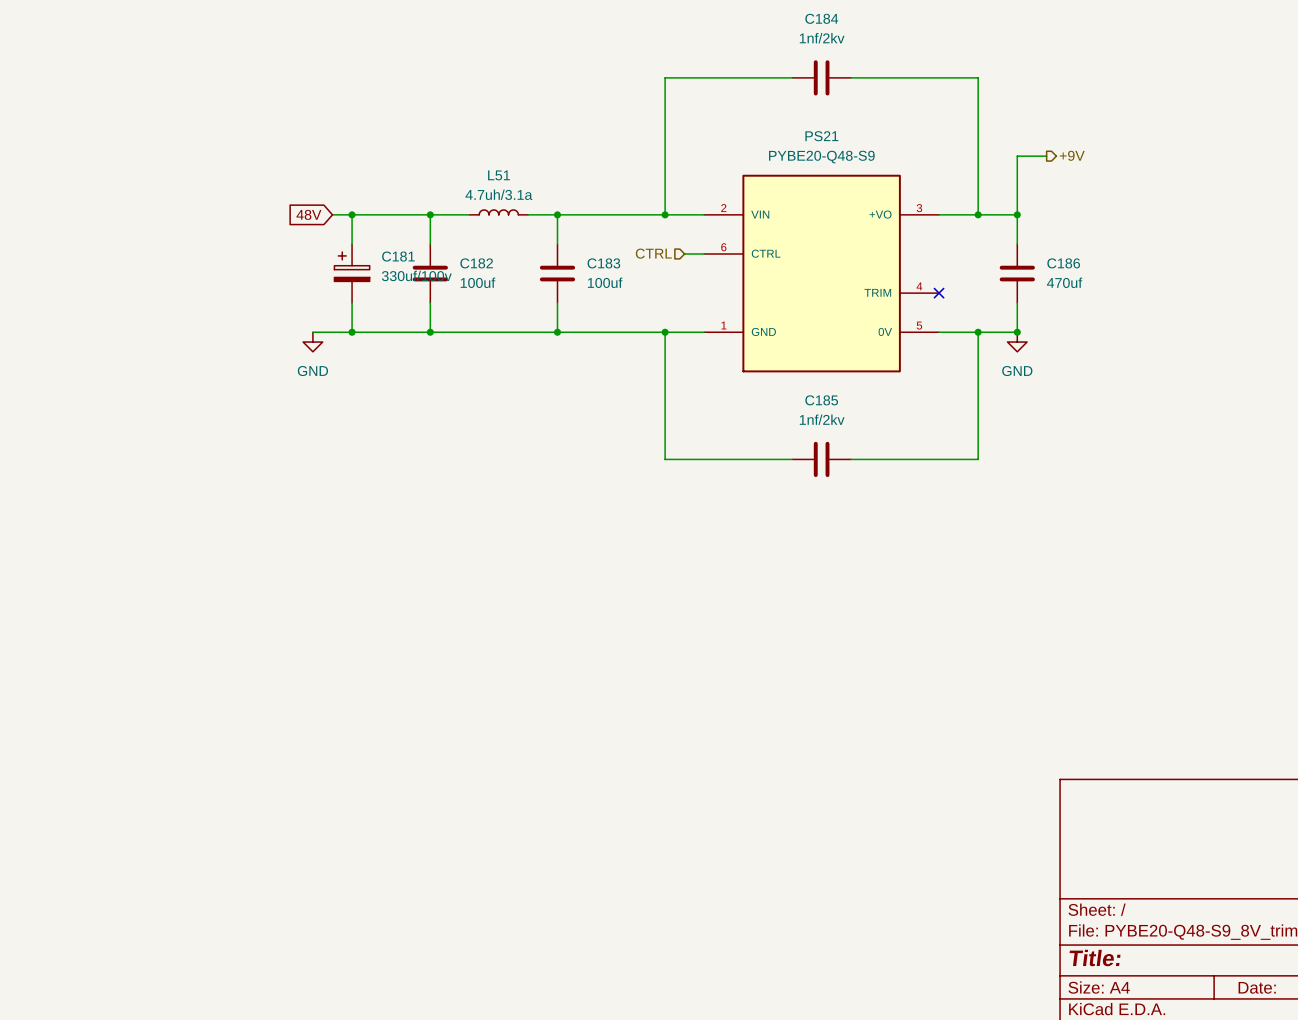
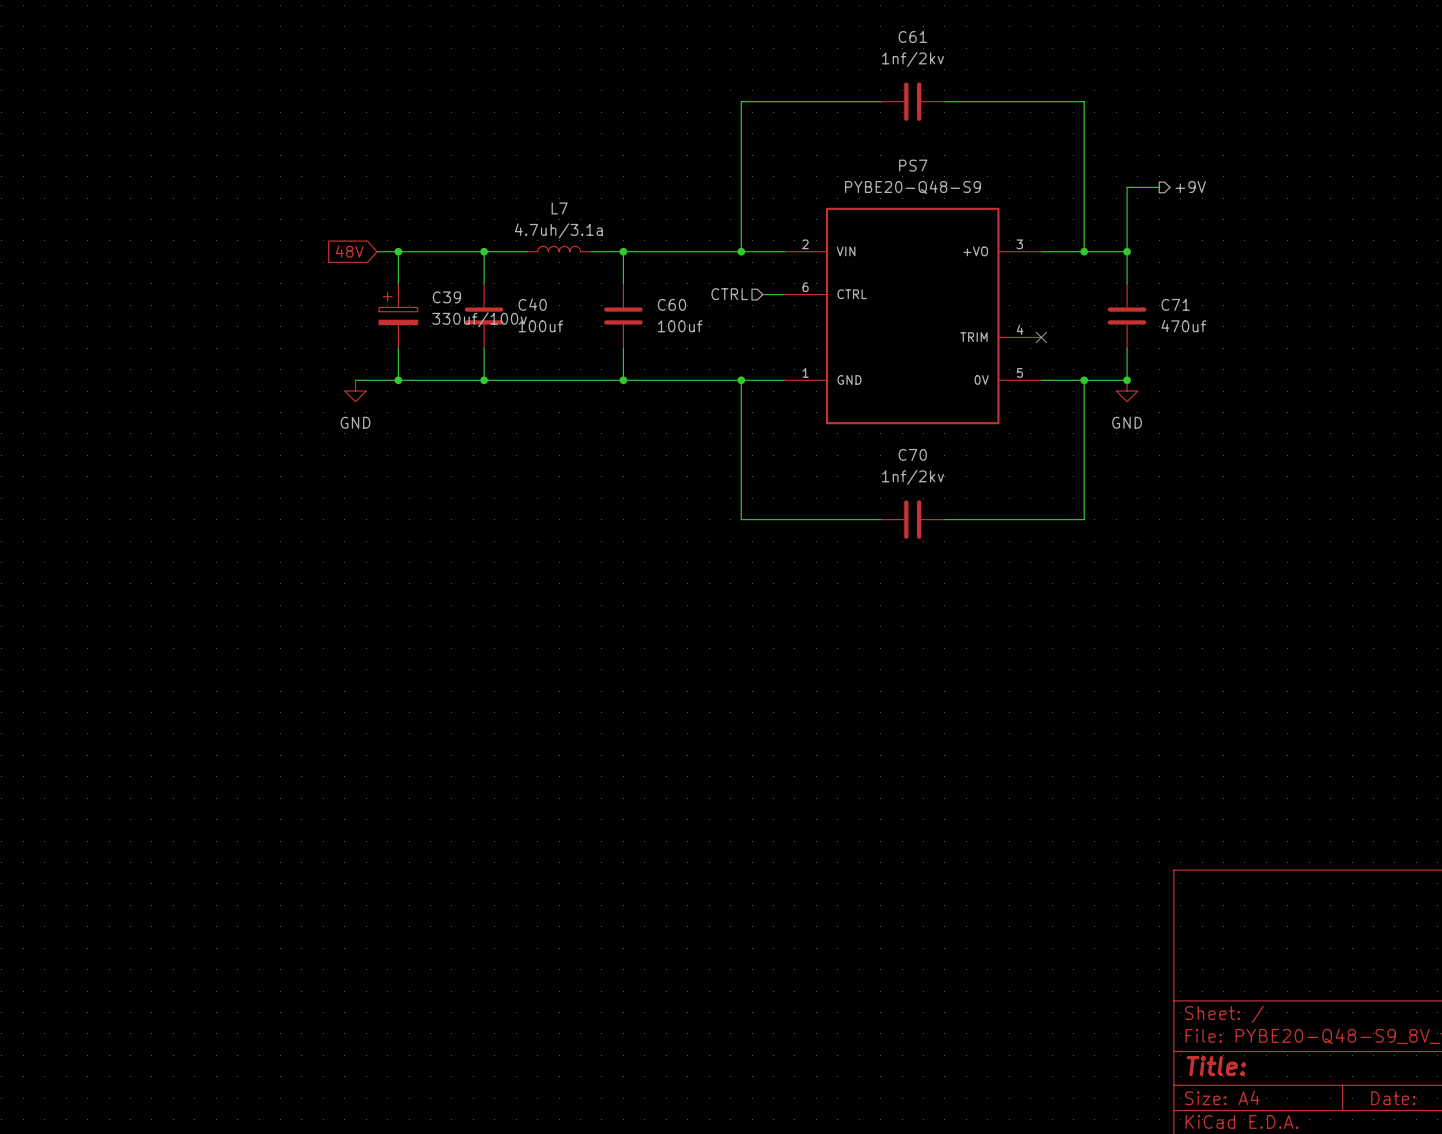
C184 name: C184 (821, 18) -> C61 (912, 36)
PS21 name: PS21 (821, 136) -> PS7 (913, 165)
L51 name: L51 (499, 175) -> L7 (559, 208)
C181 name: C181 (398, 256) -> C39 (446, 297)
C182 name: C182 (476, 263) -> C40 (532, 304)
C183 name: C183 (603, 263) -> C60 (671, 304)
C186 name: C186 (1063, 263) -> C71 (1175, 304)
C185 name: C185 (821, 400) -> C70 (912, 454)

